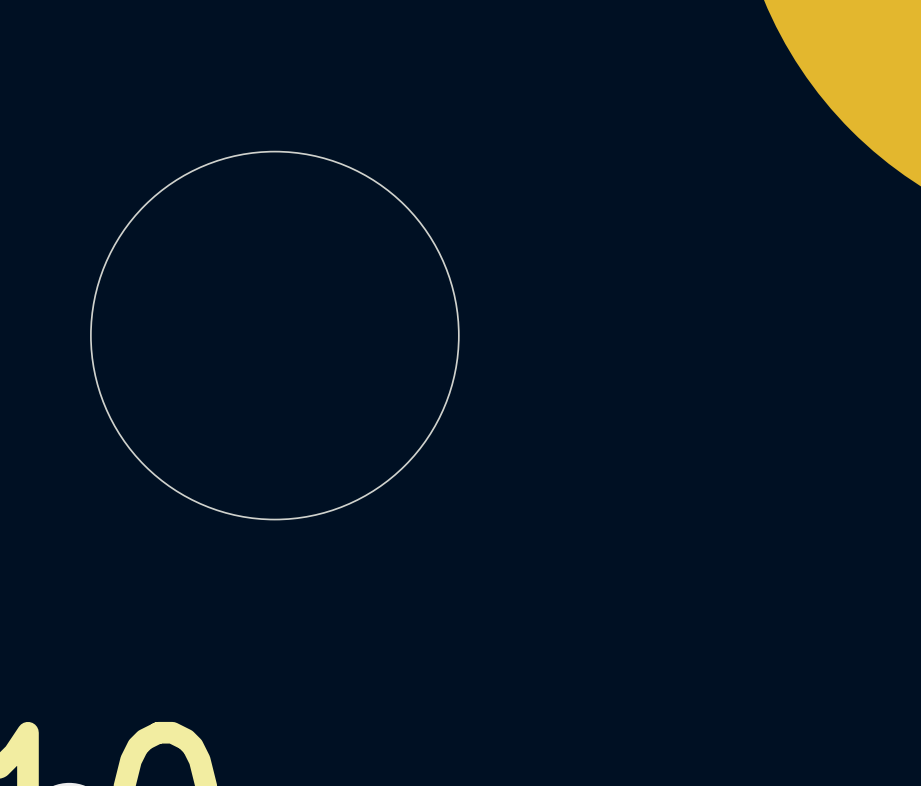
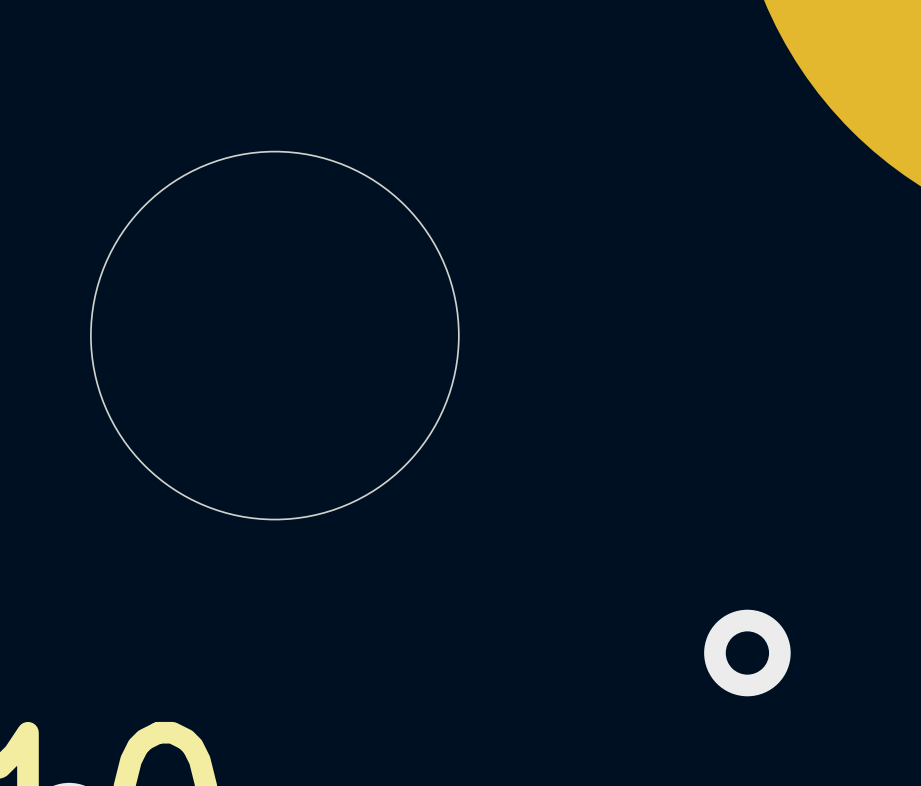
via: none -> (747, 653)

